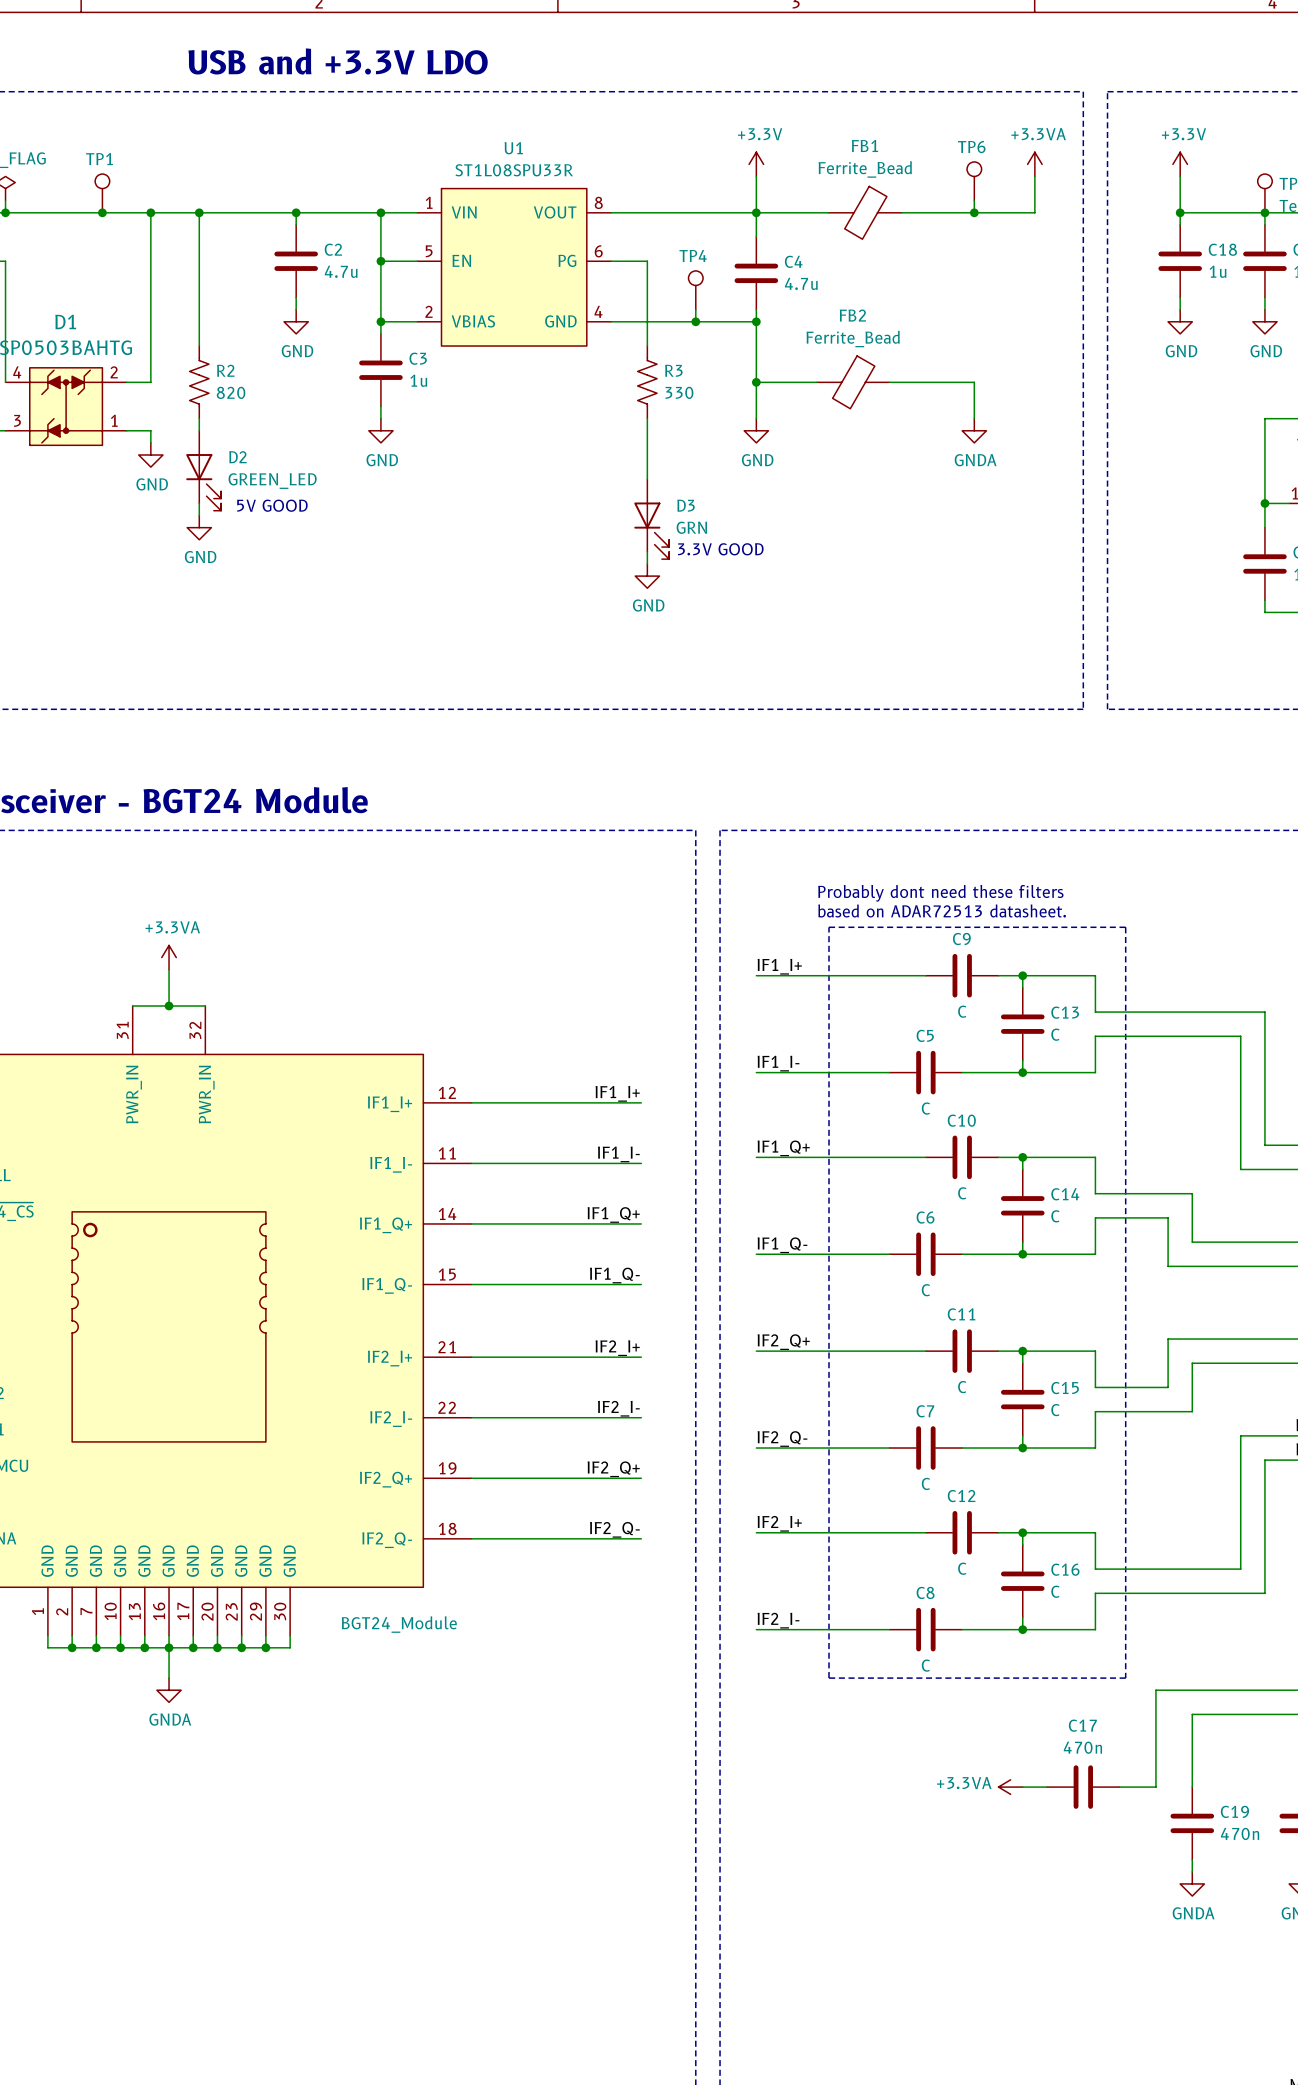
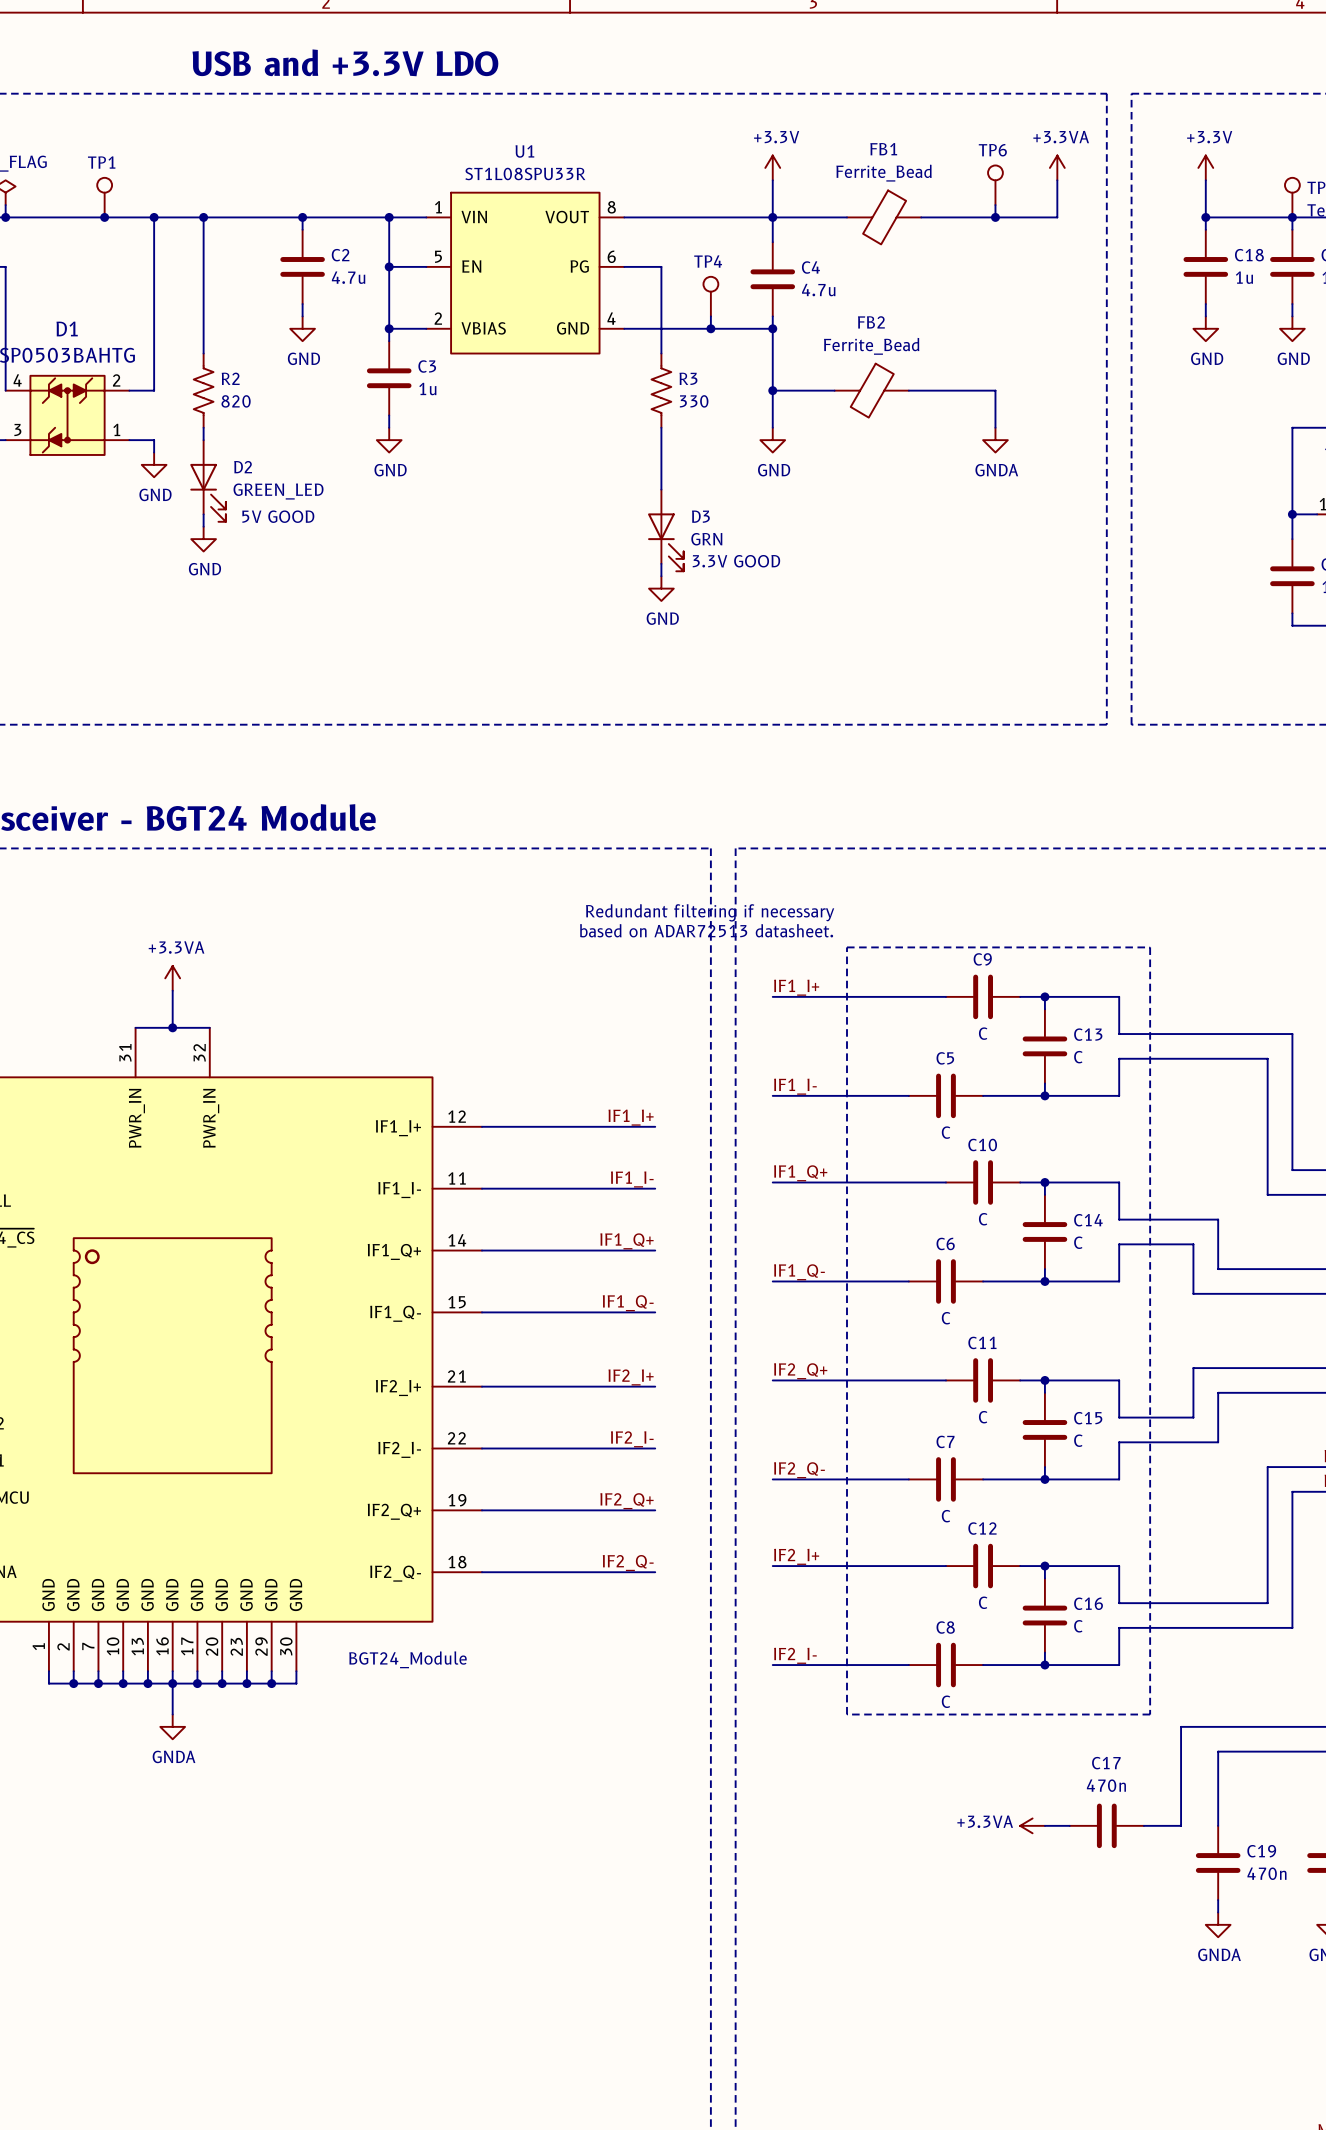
text: Probably dont need these filters (940, 893) -> Redundant filtering if necessary (710, 912)
text position: based on ADAR72513 datasheet. (942, 910) -> based on ADAR72513 datasheet. (706, 930)

